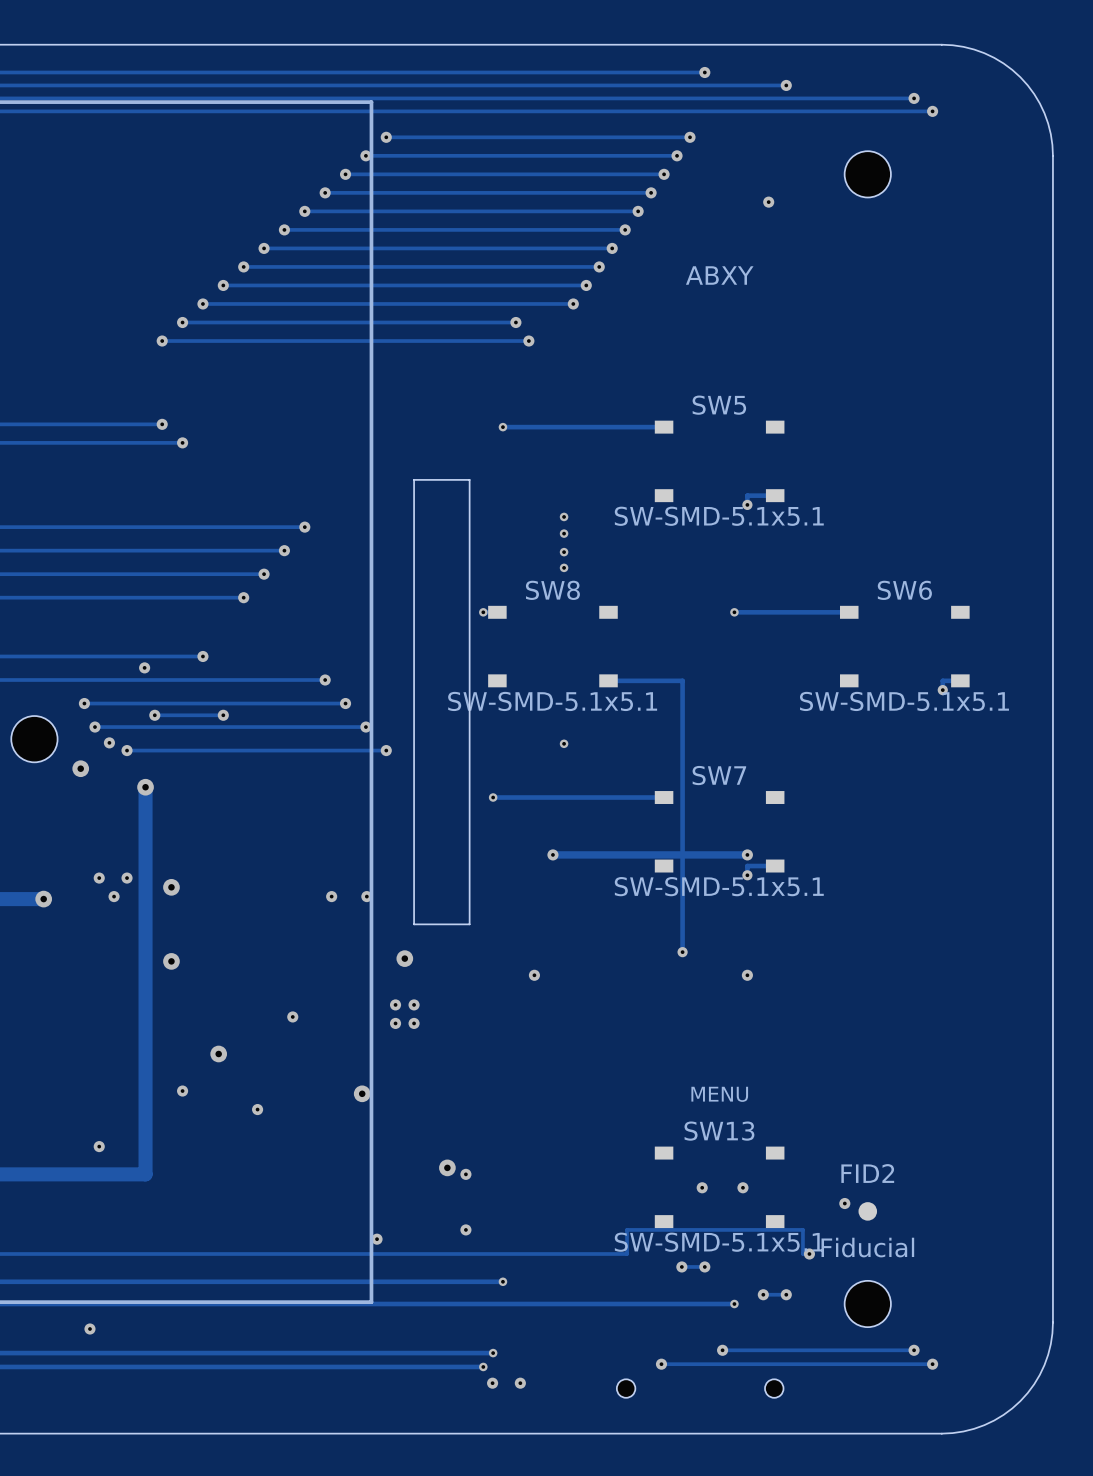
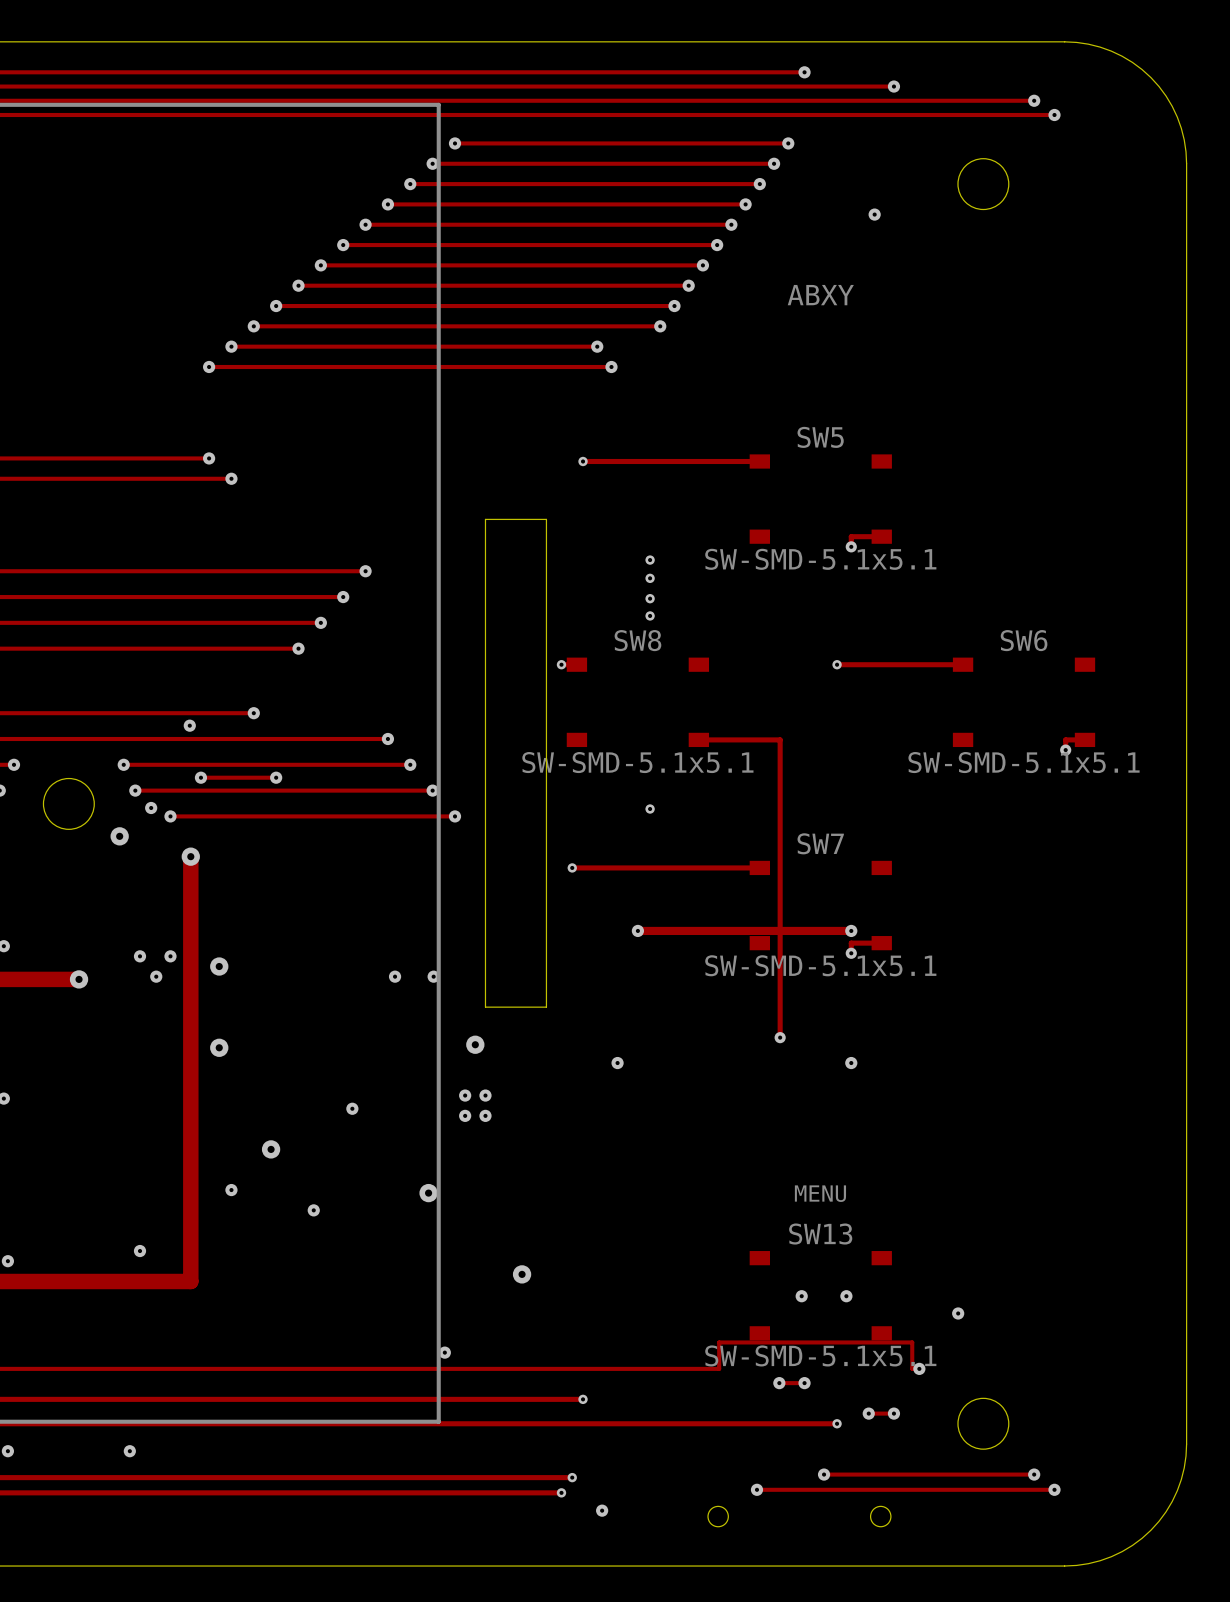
via: (465, 1174) -> none
FID2: Fiducial (867, 1211) -> none
via: (465, 1229) -> none
via: (492, 1383) -> none

